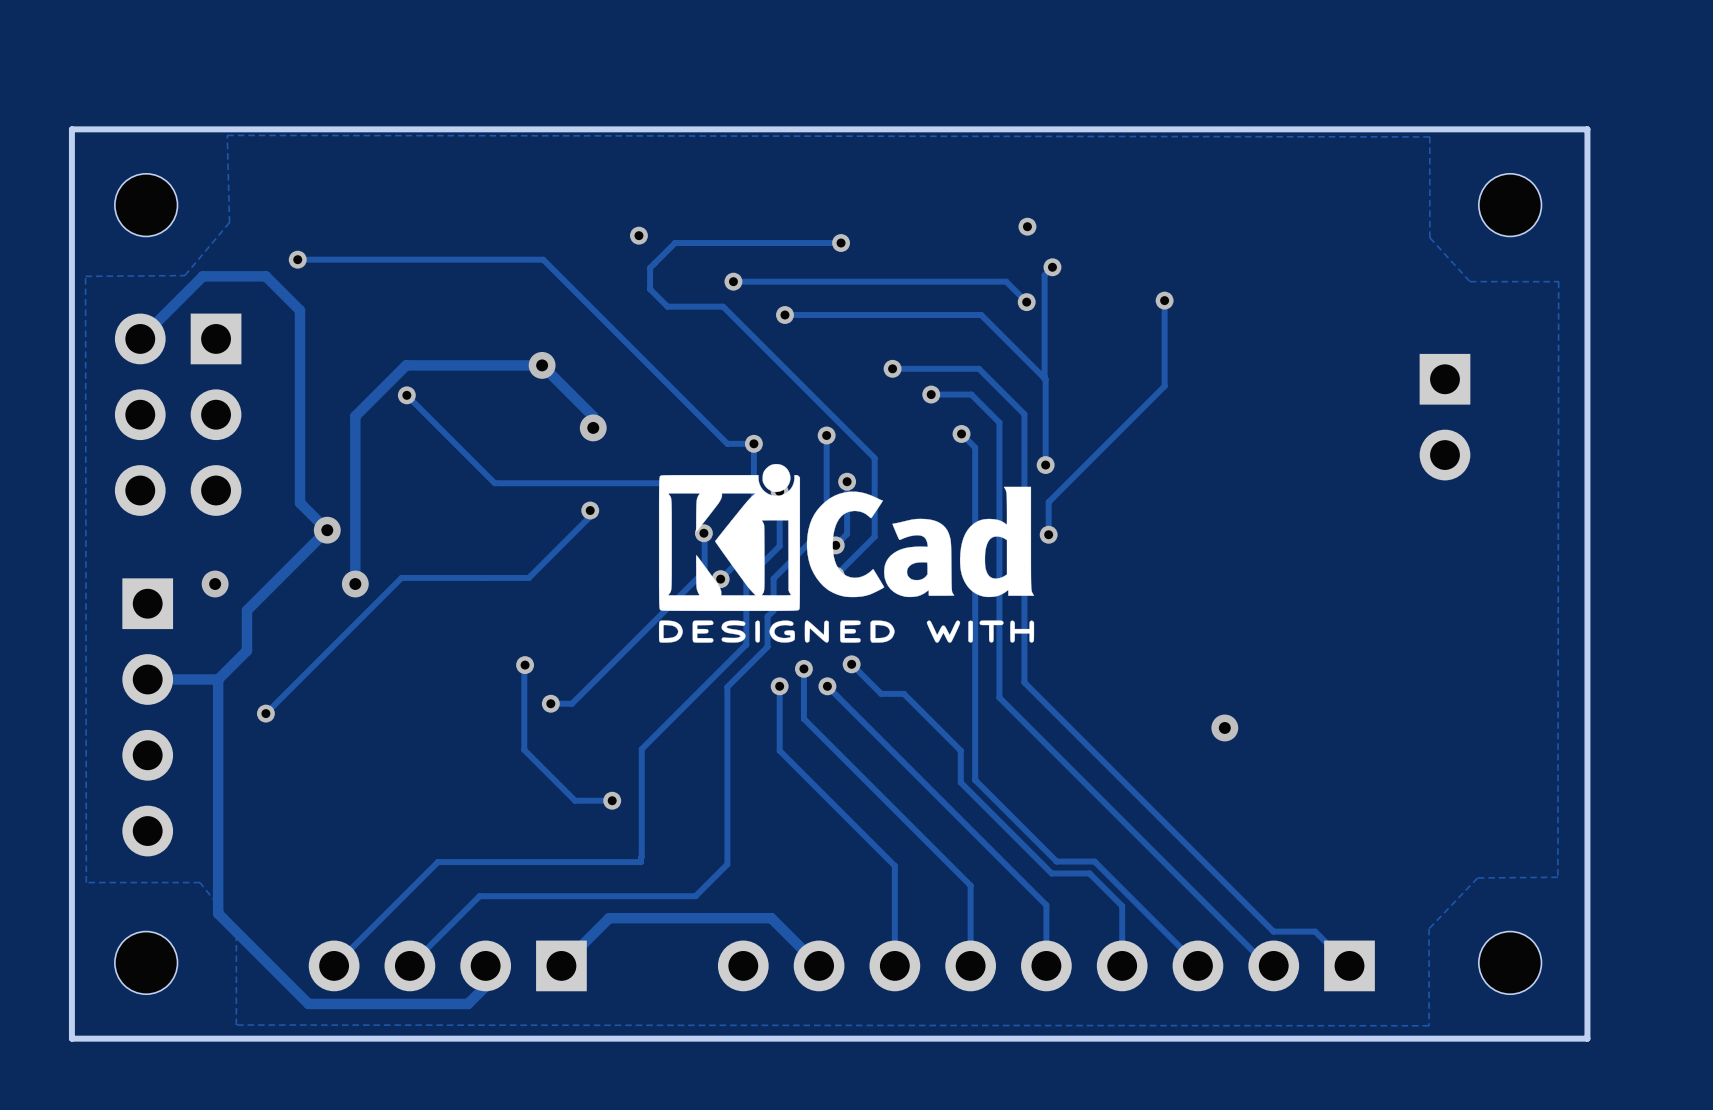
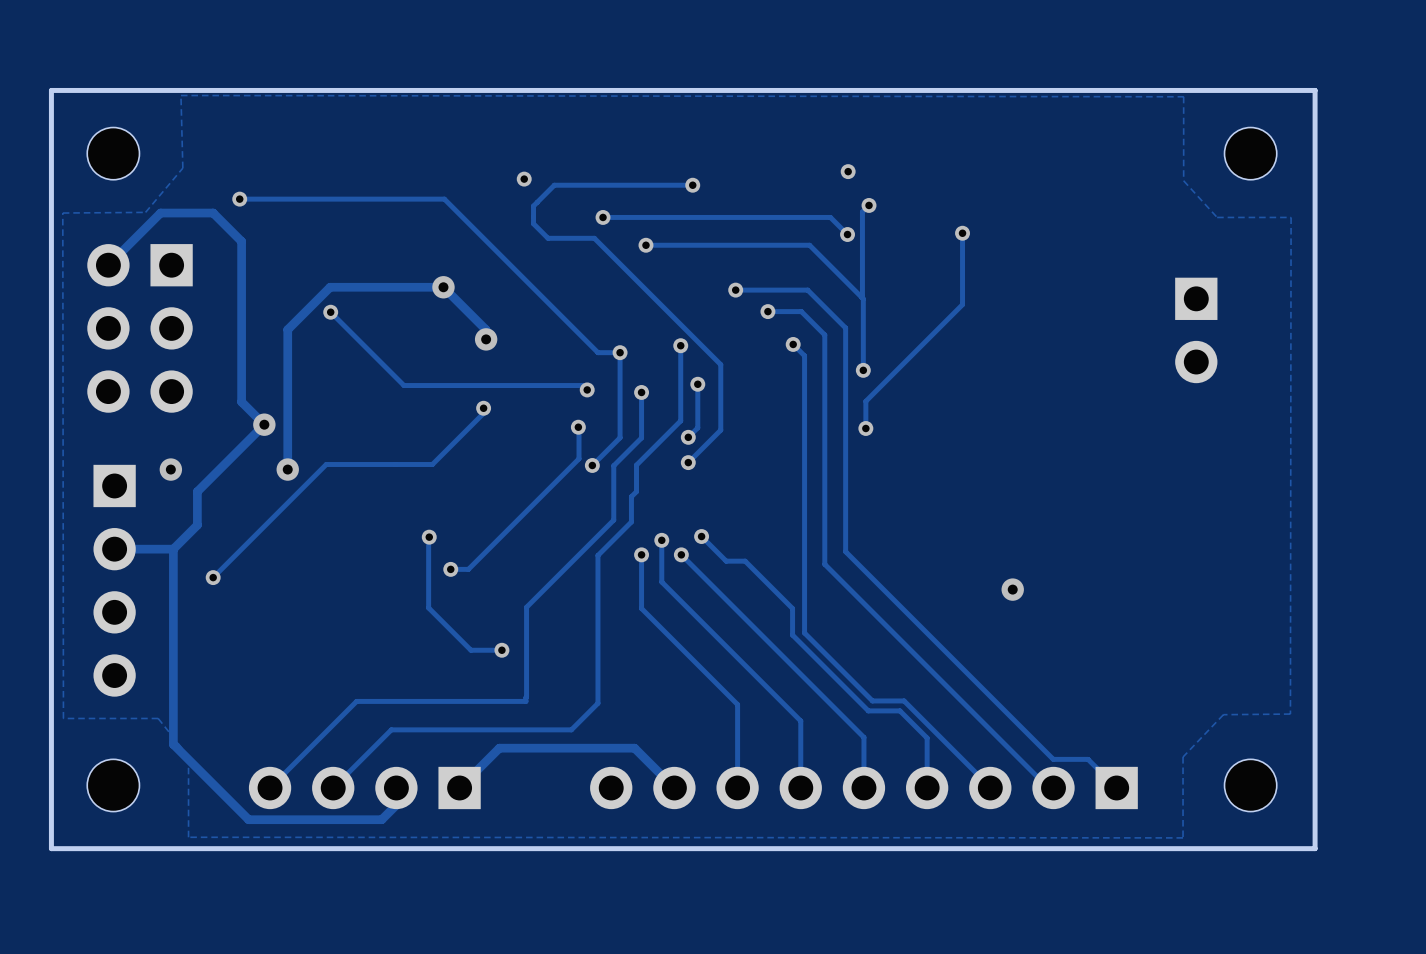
drawing: [658, 463, 1035, 643] -> none

